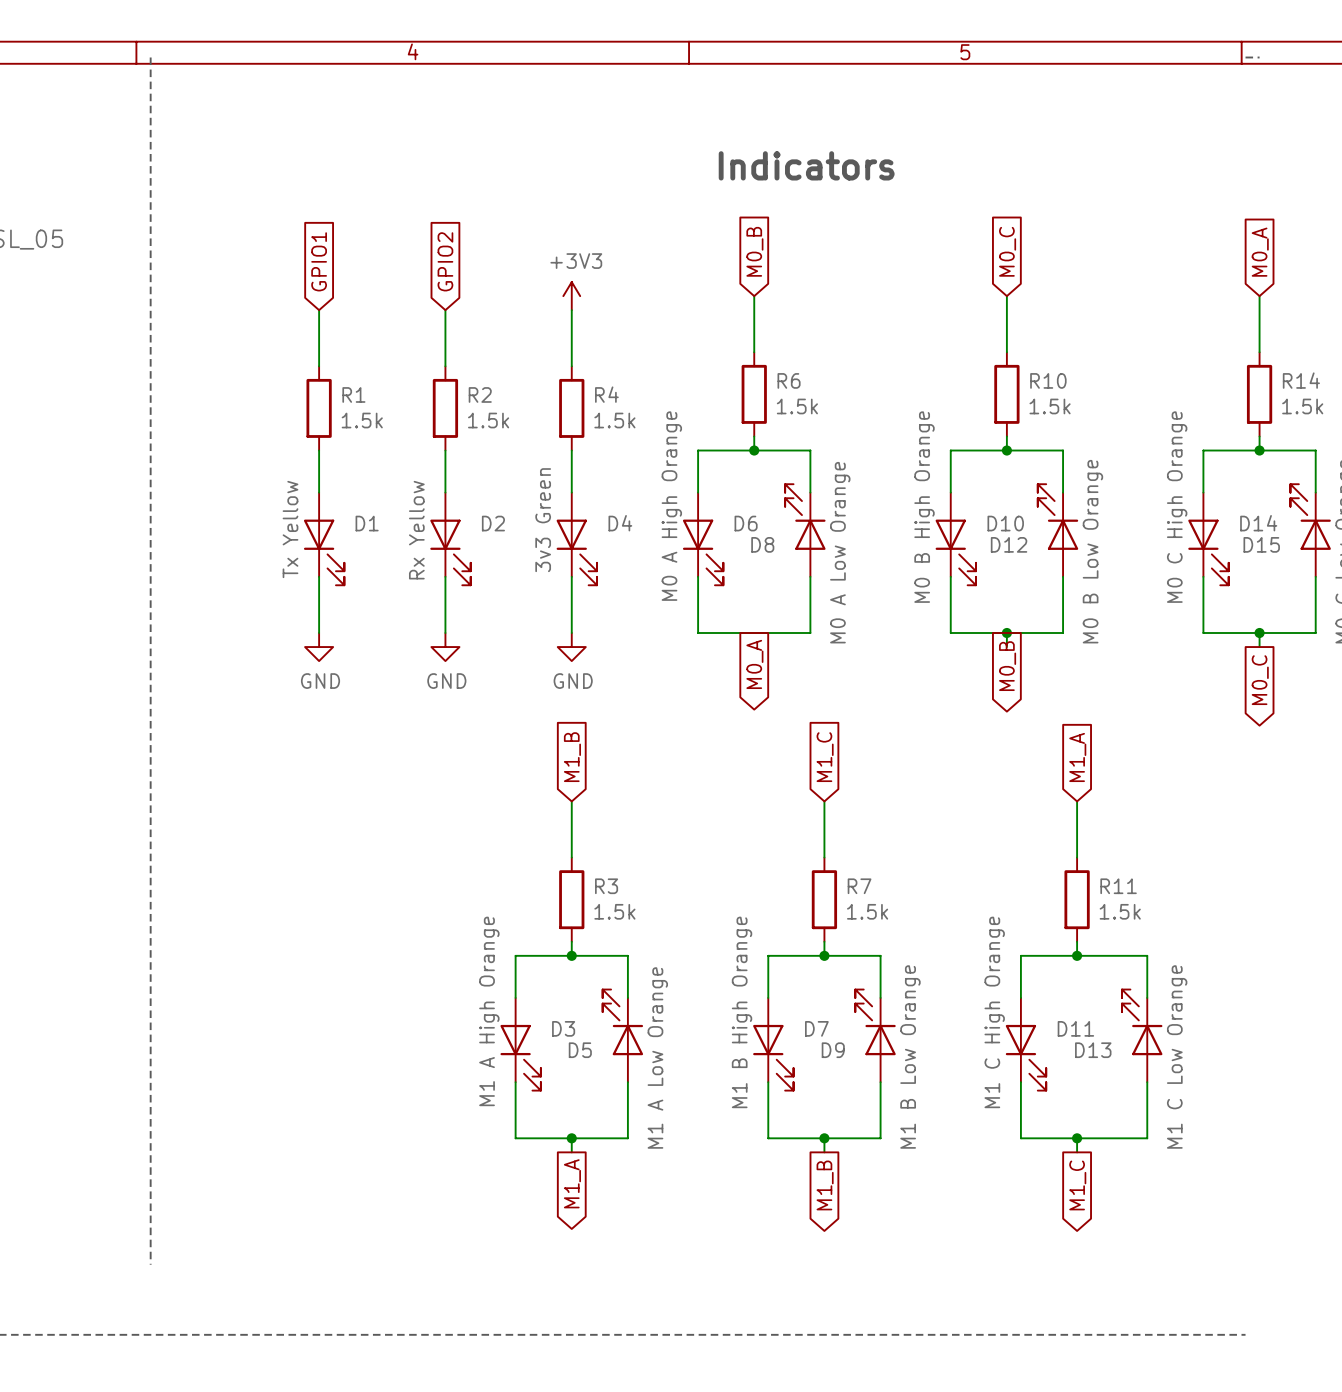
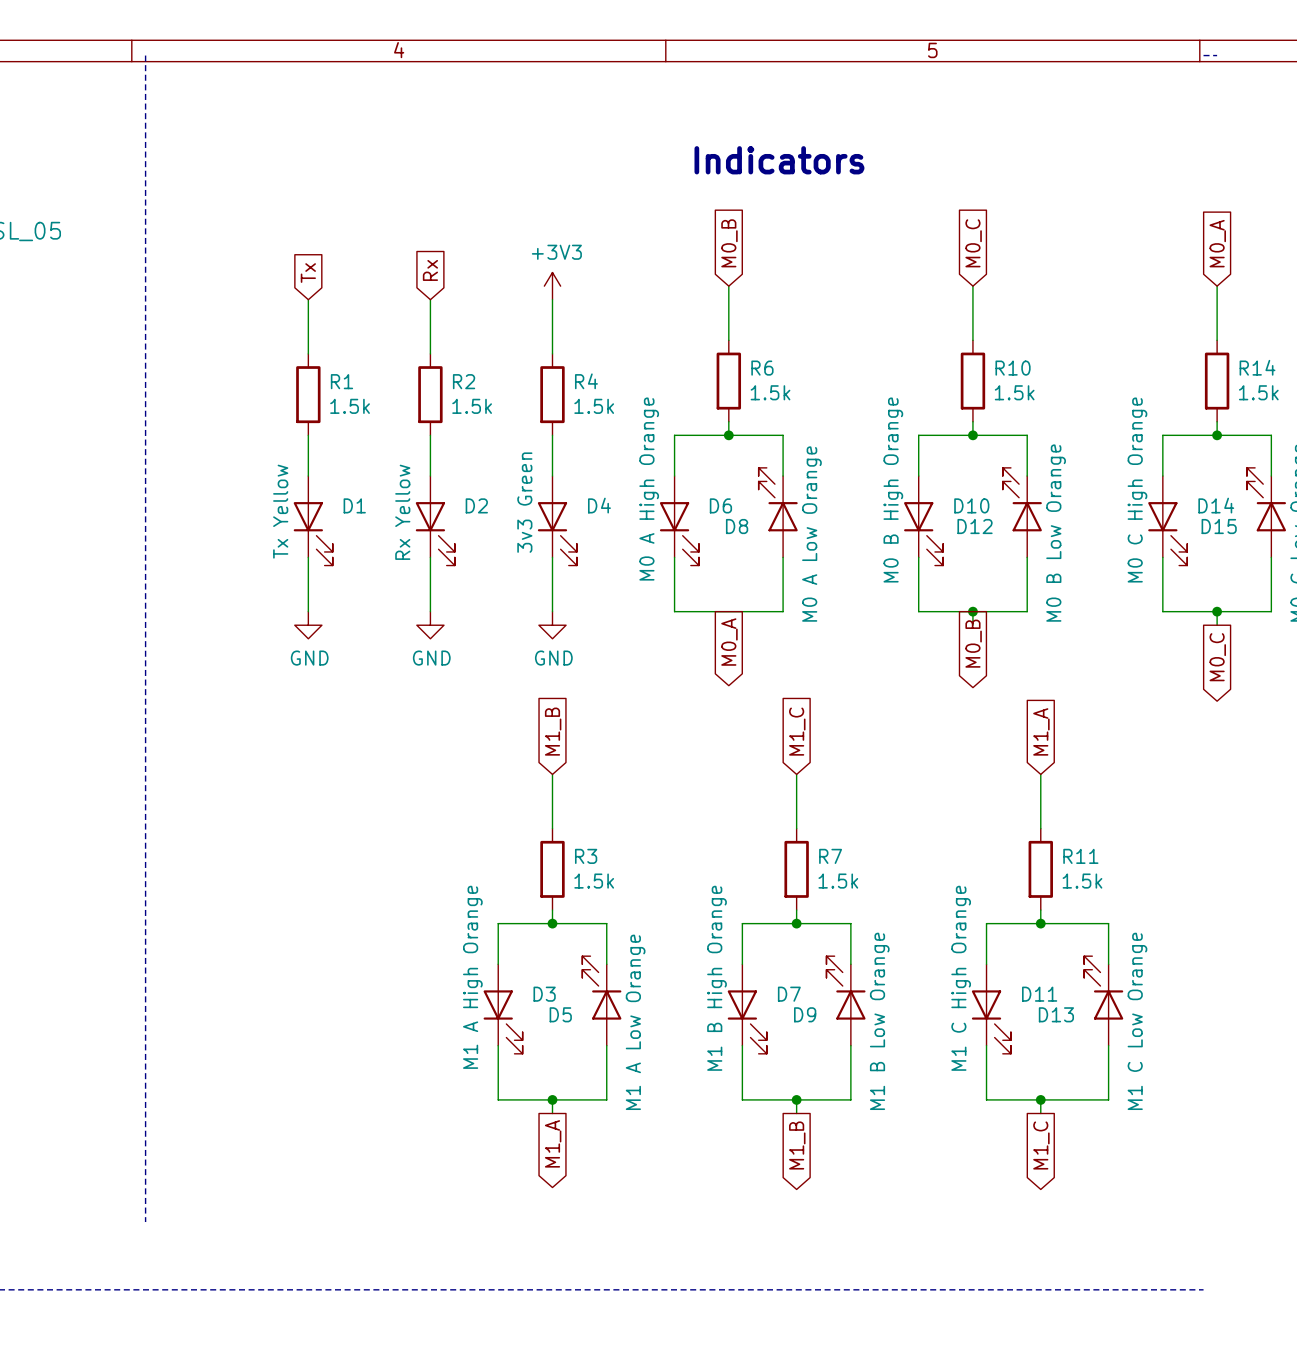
global label: GPIO1 (319, 261) -> Tx (308, 273)
global label: GPIO2 (445, 261) -> Rx (430, 270)

